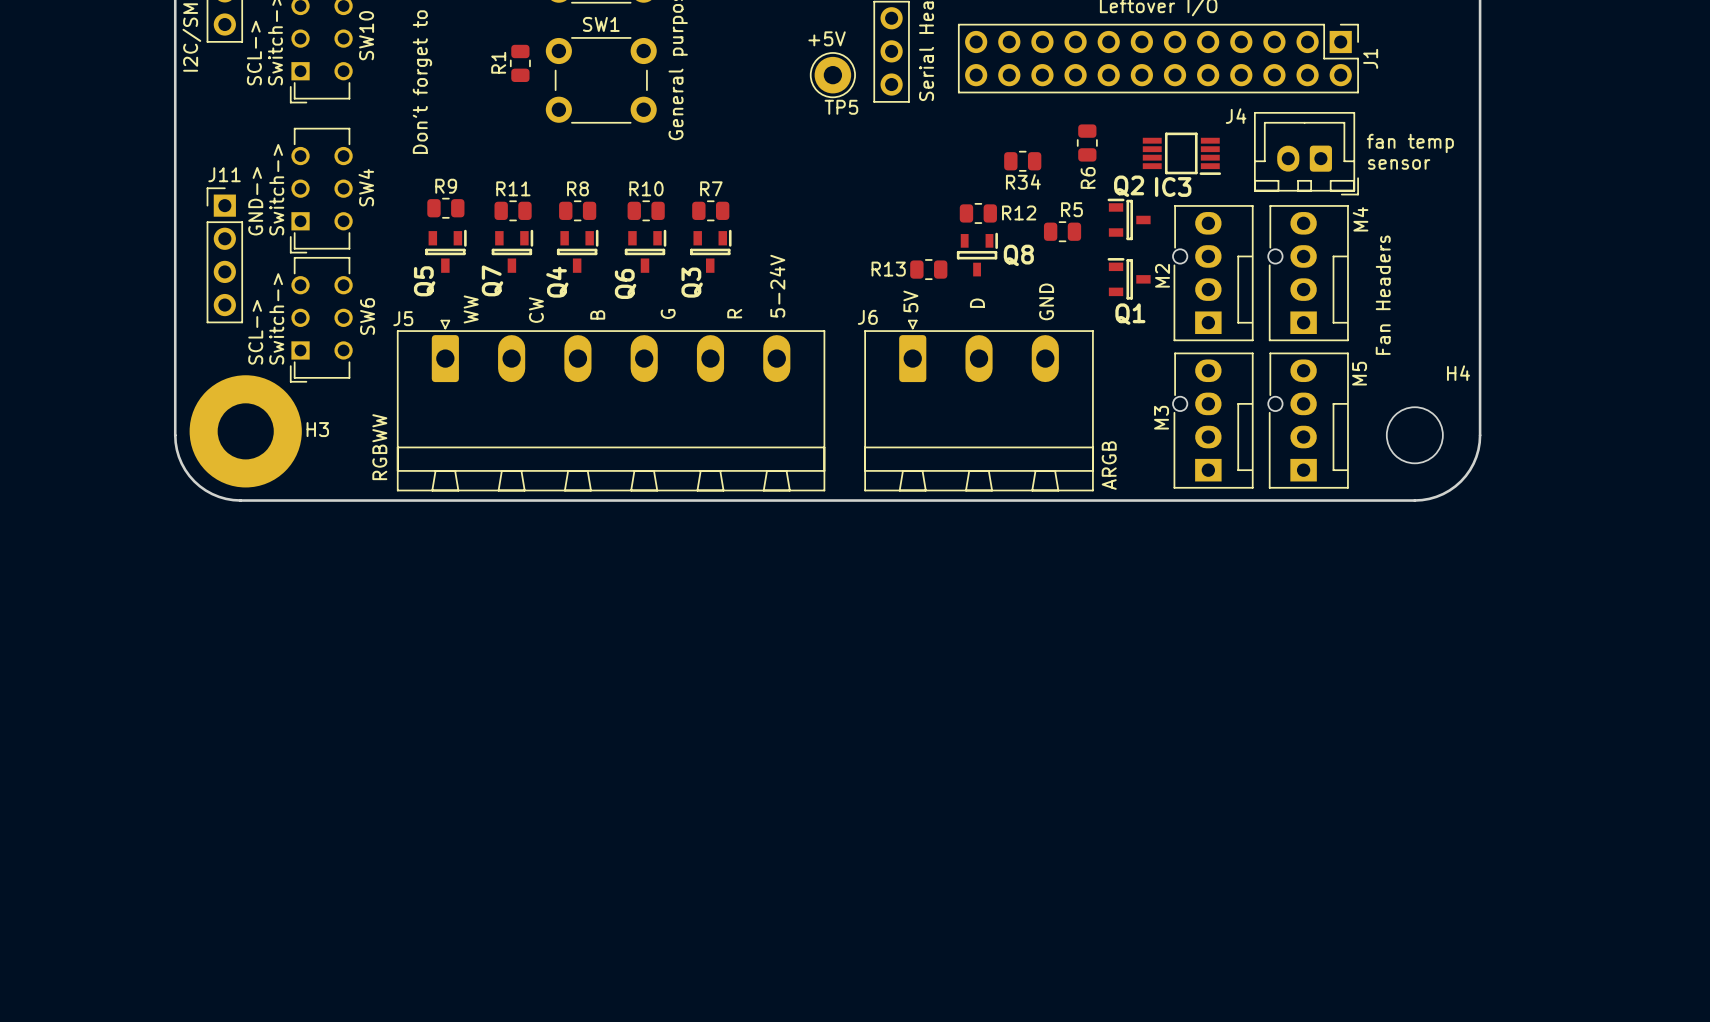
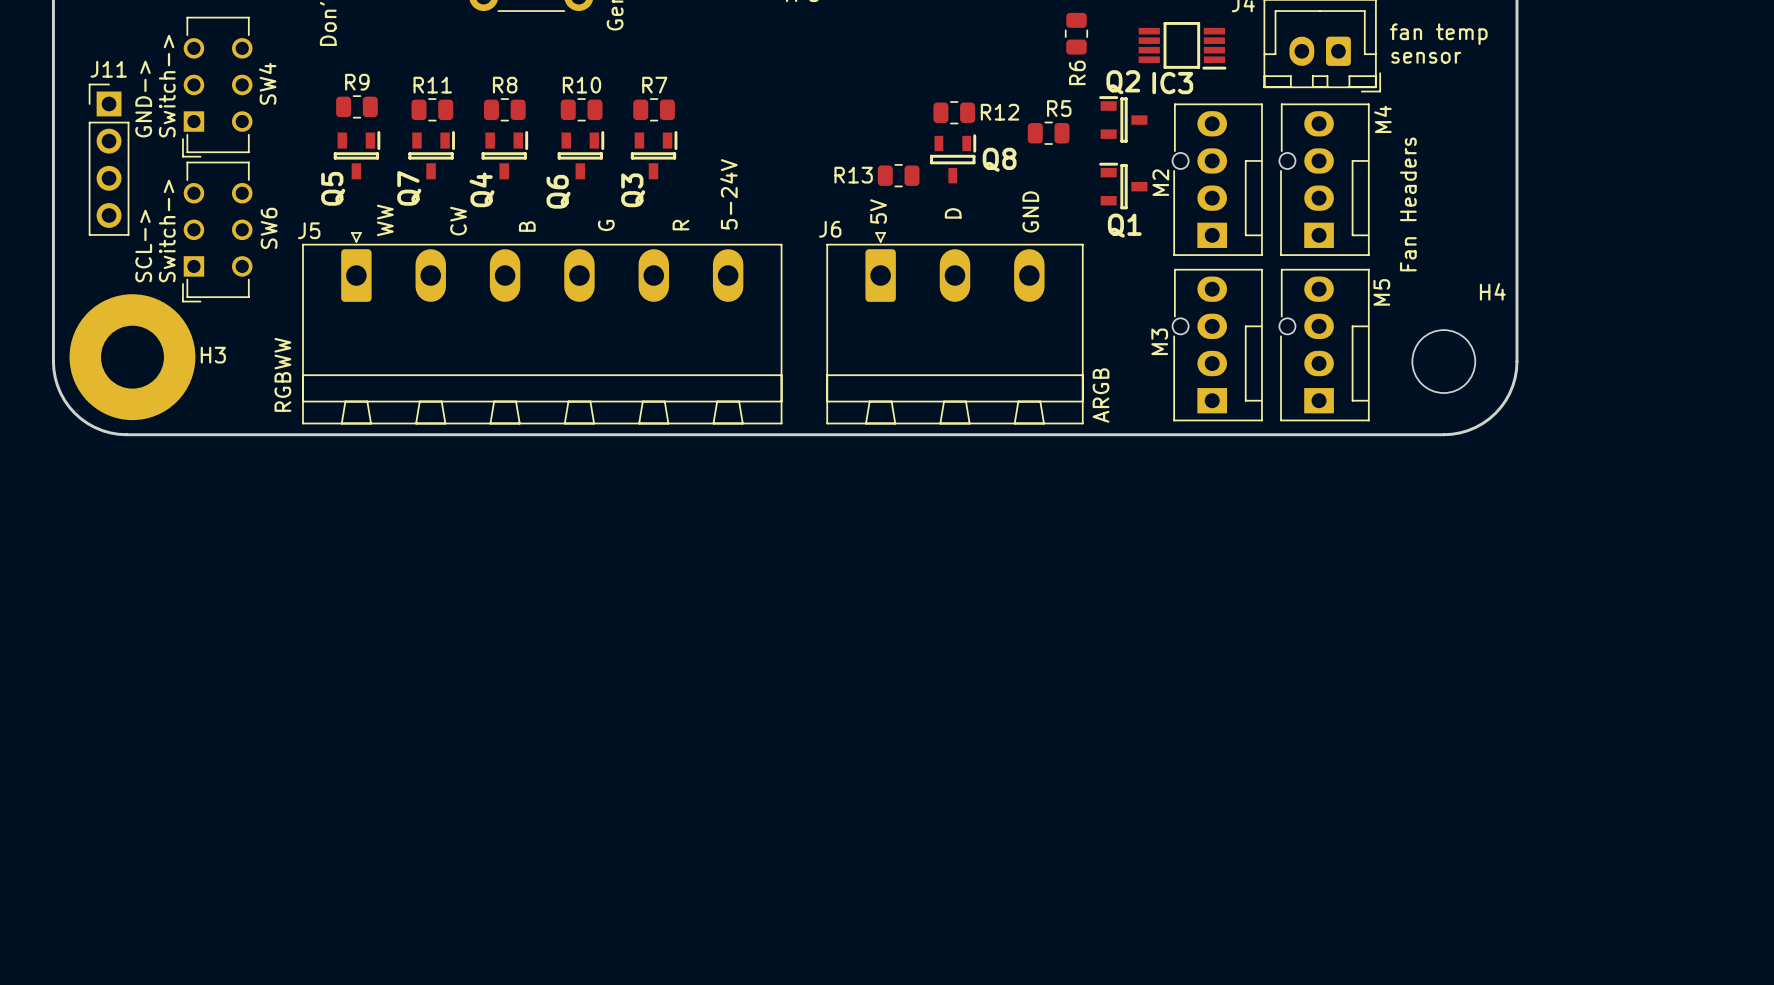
R34: (1022, 161) -> none

